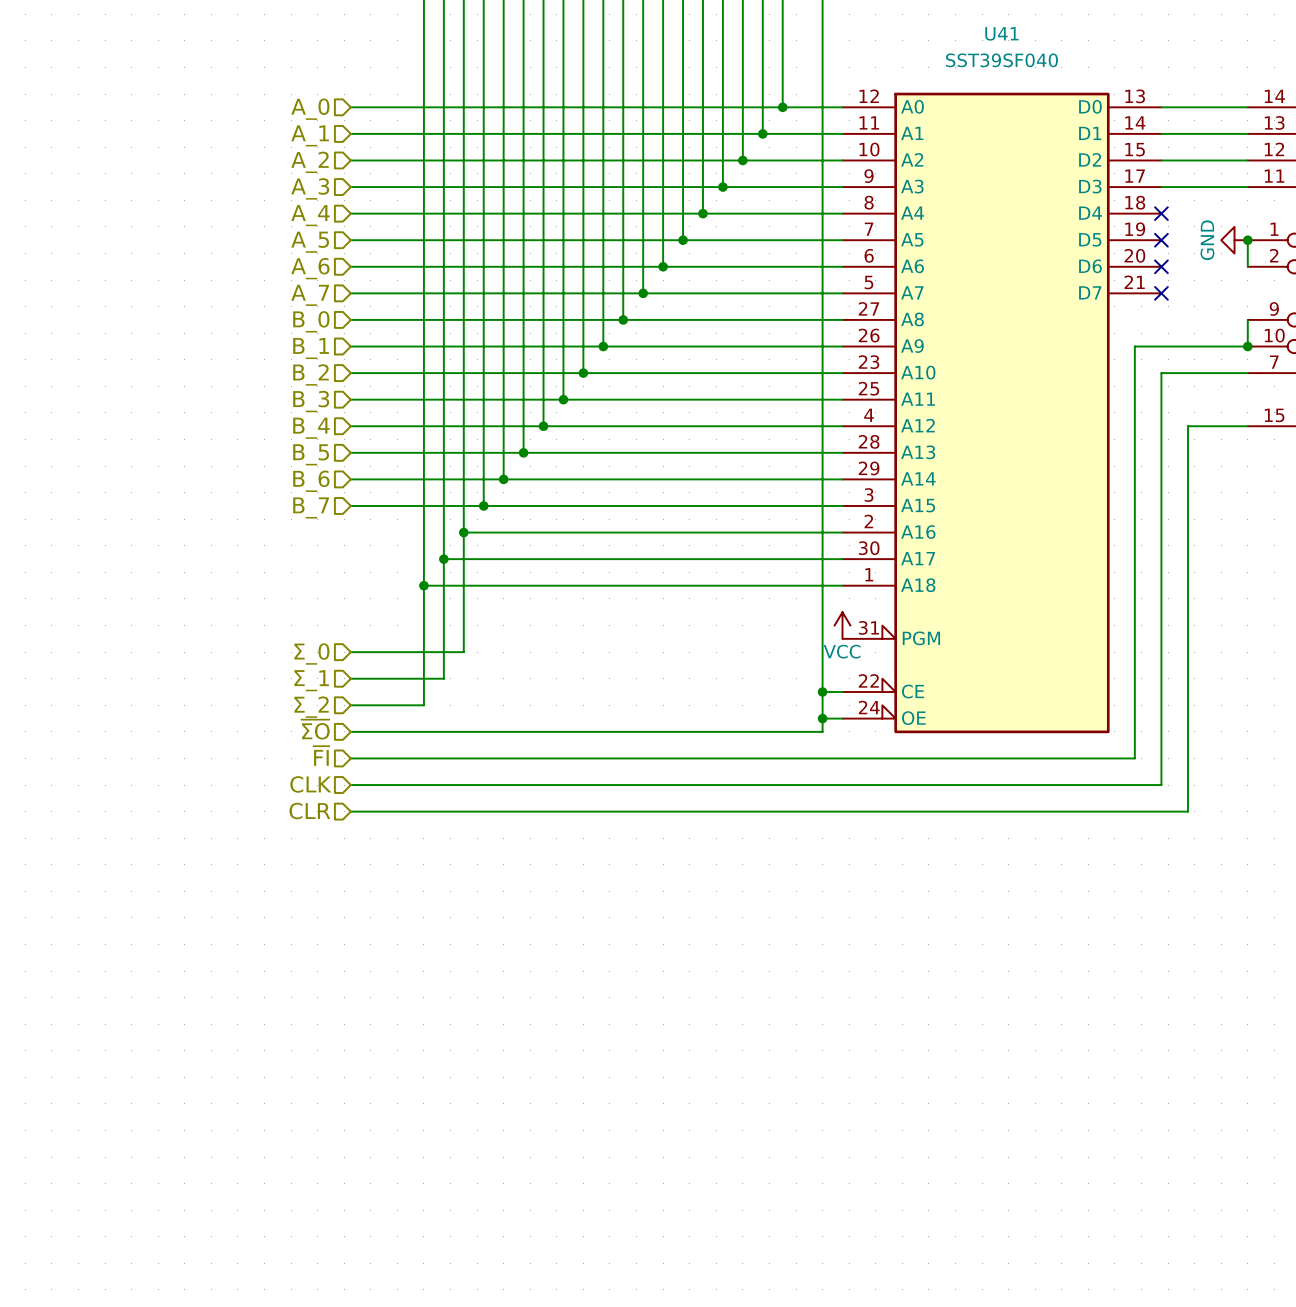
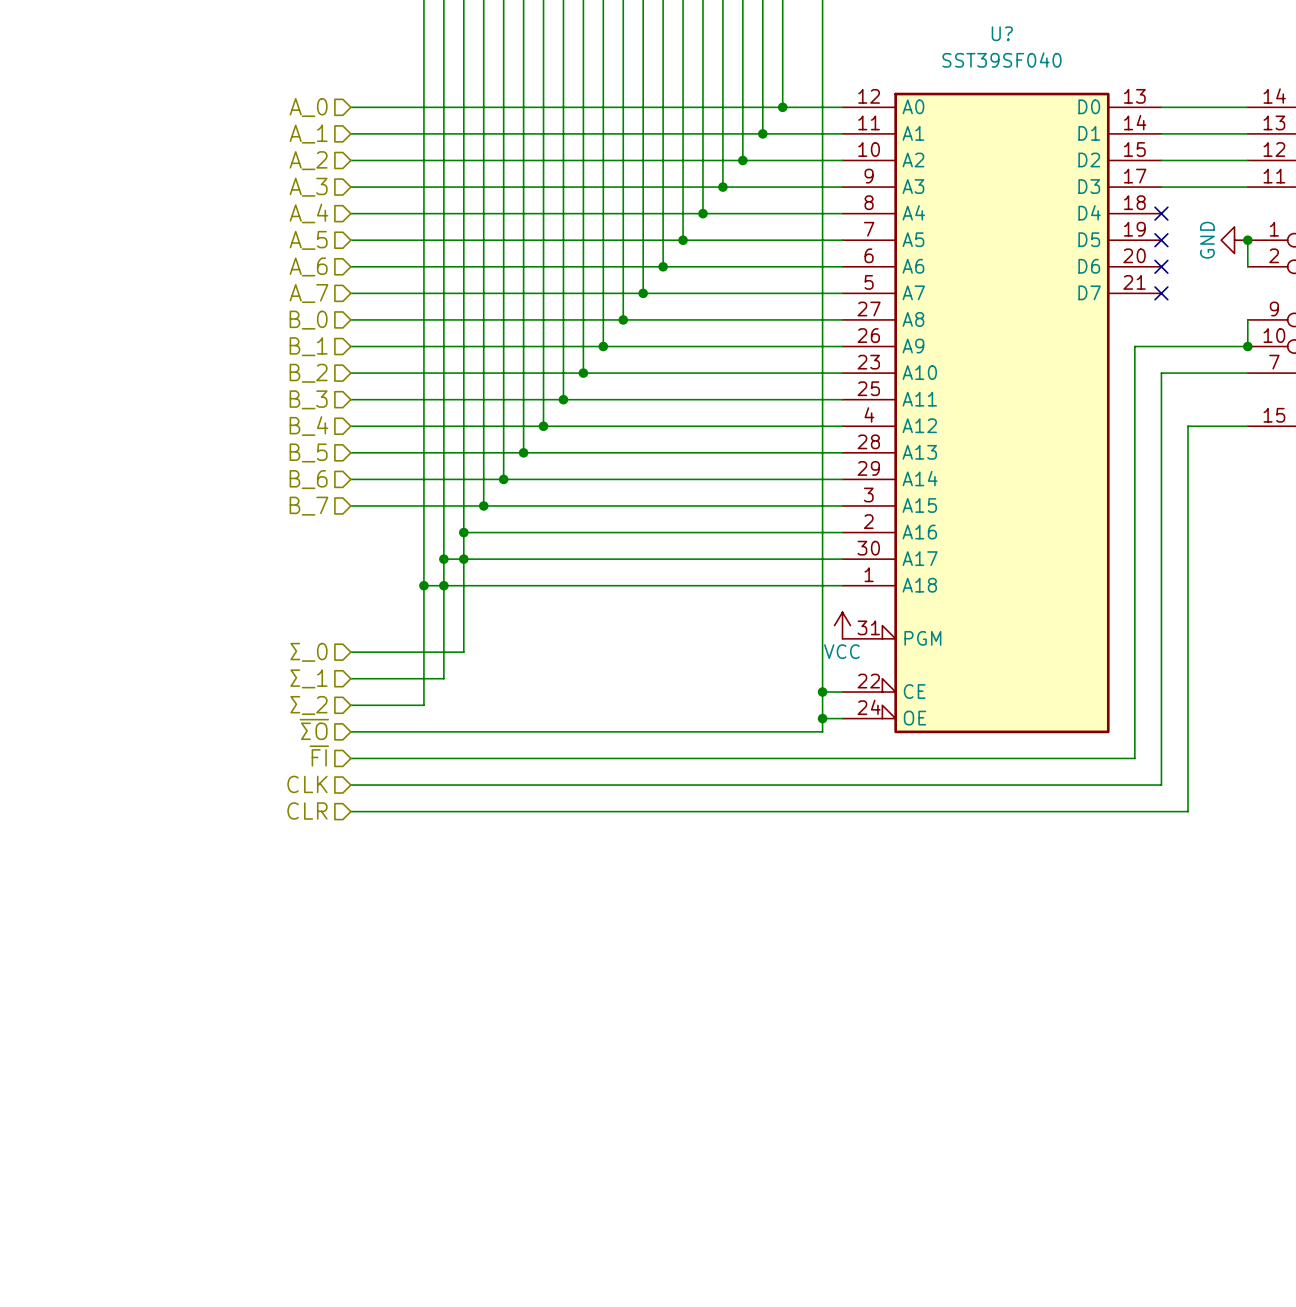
U41 name: U41 (1001, 33) -> U? (1002, 33)
junction: none -> (463, 559)
junction: none -> (443, 585)

